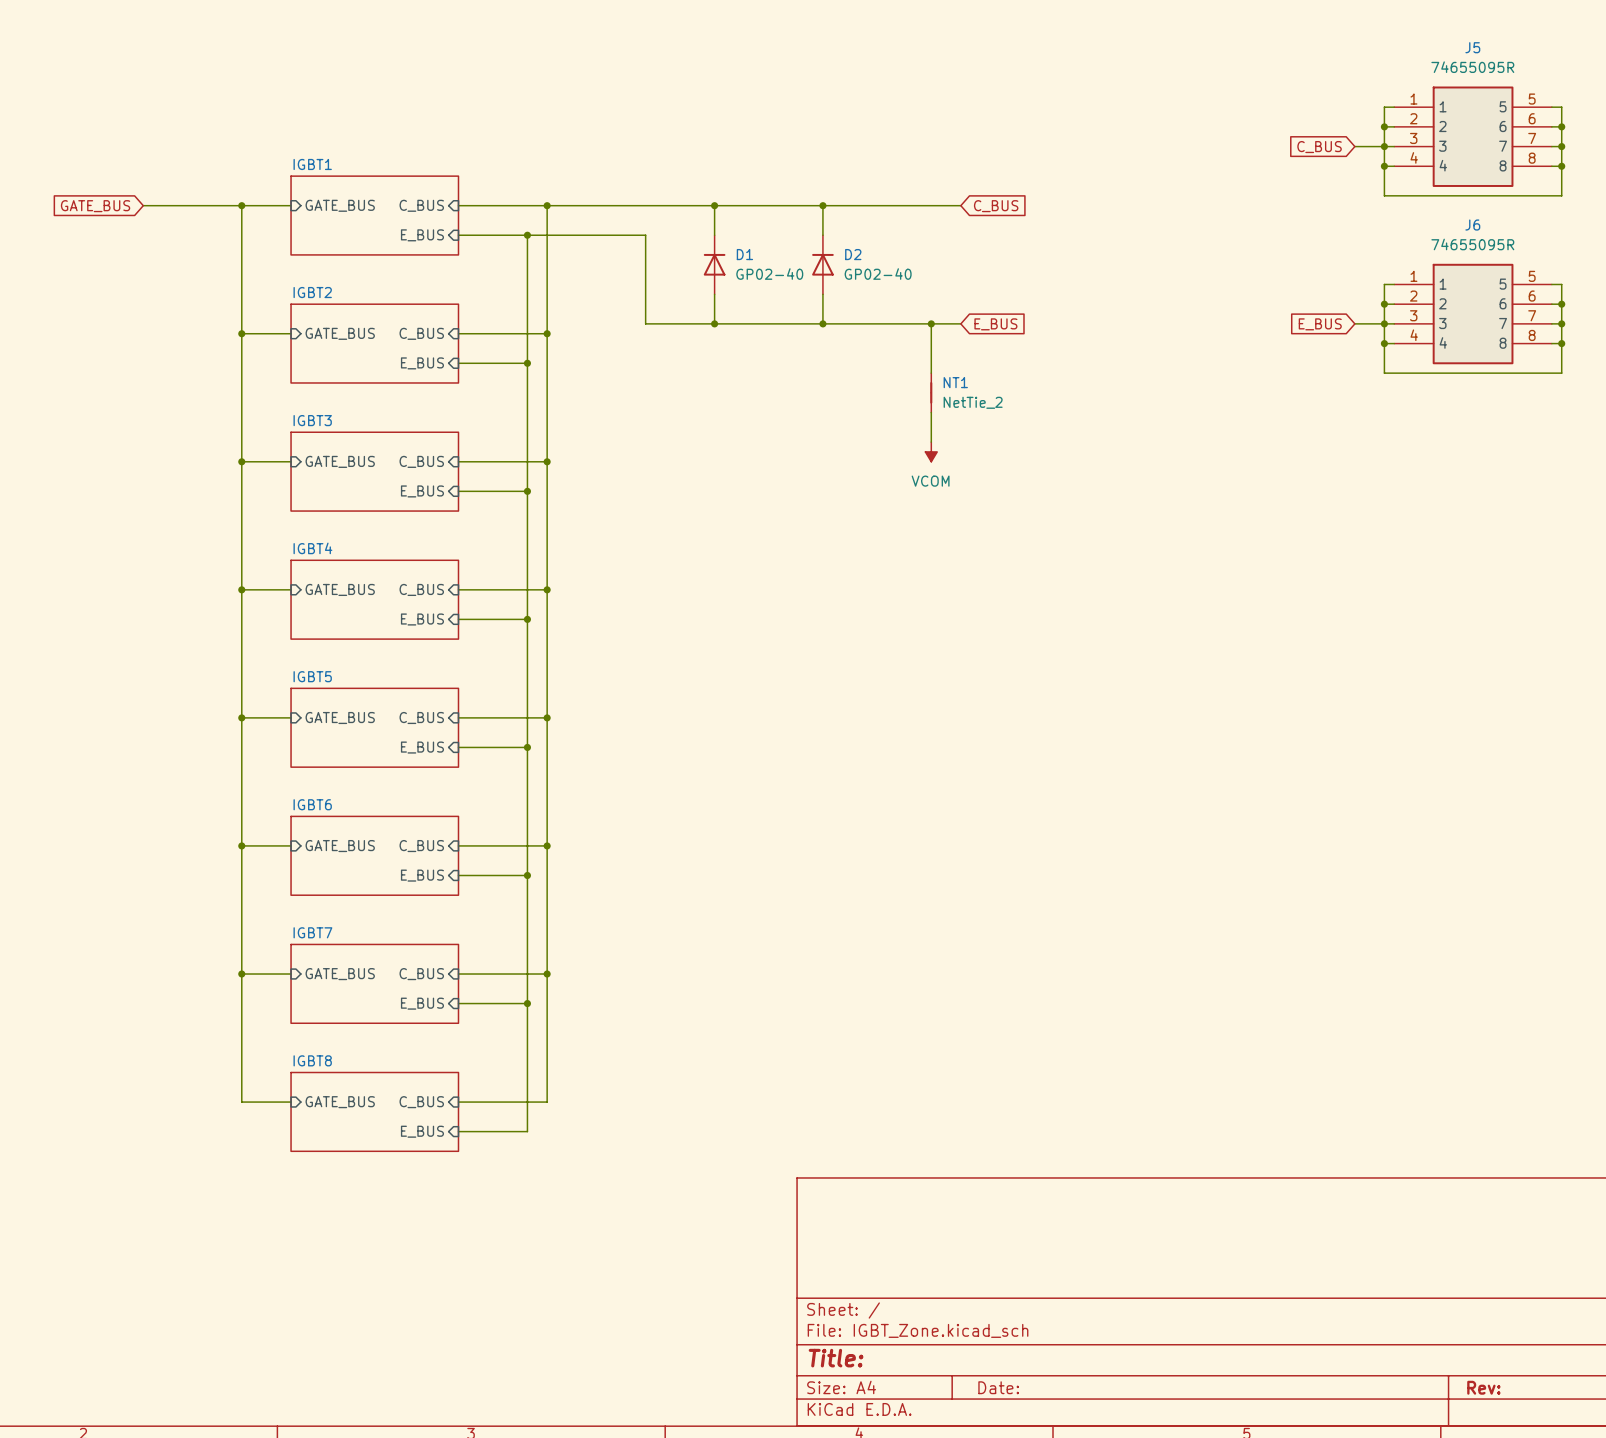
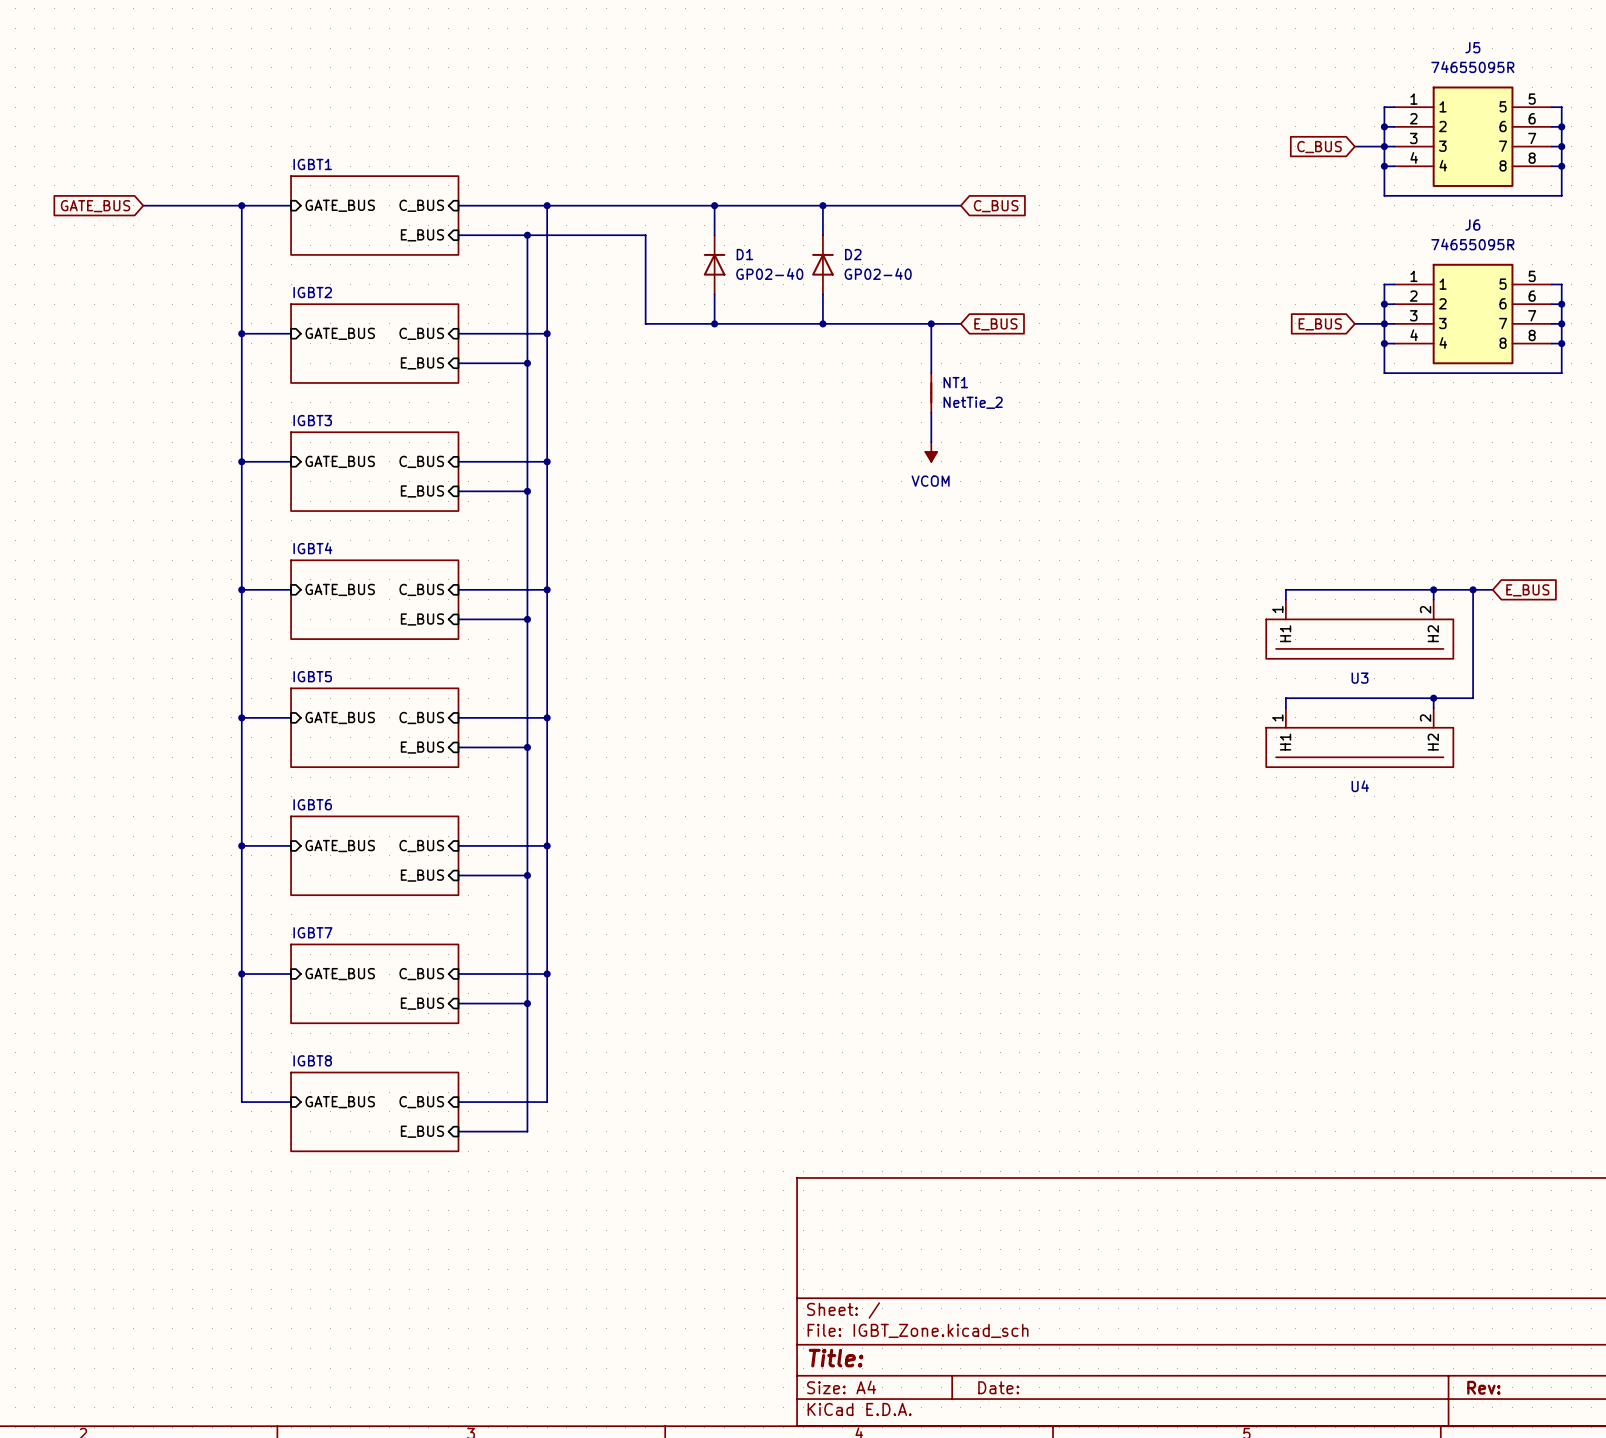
wire: none -> (1433, 589) (1433, 599)
junction: none -> (1433, 589)
wire: none -> (1473, 589) (1473, 698) (1285, 698) (1285, 708)
junction: none -> (1473, 589)
wire: none -> (1492, 589) (1285, 589) (1285, 599)
global label: none -> E_BUS (1527, 590)
U3: none -> (1359, 629)
wire: none -> (1433, 698) (1433, 708)
junction: none -> (1433, 698)
U4: none -> (1359, 737)

